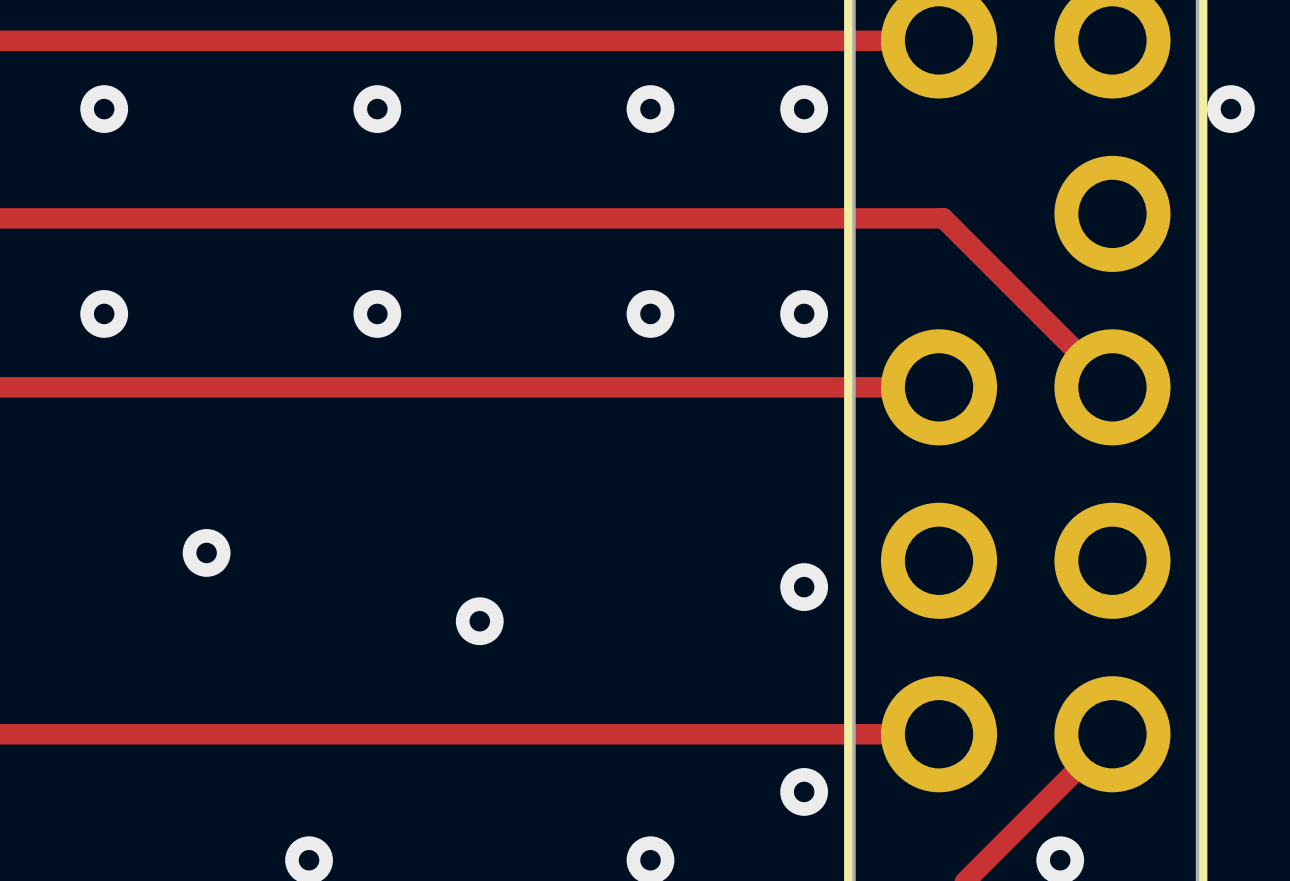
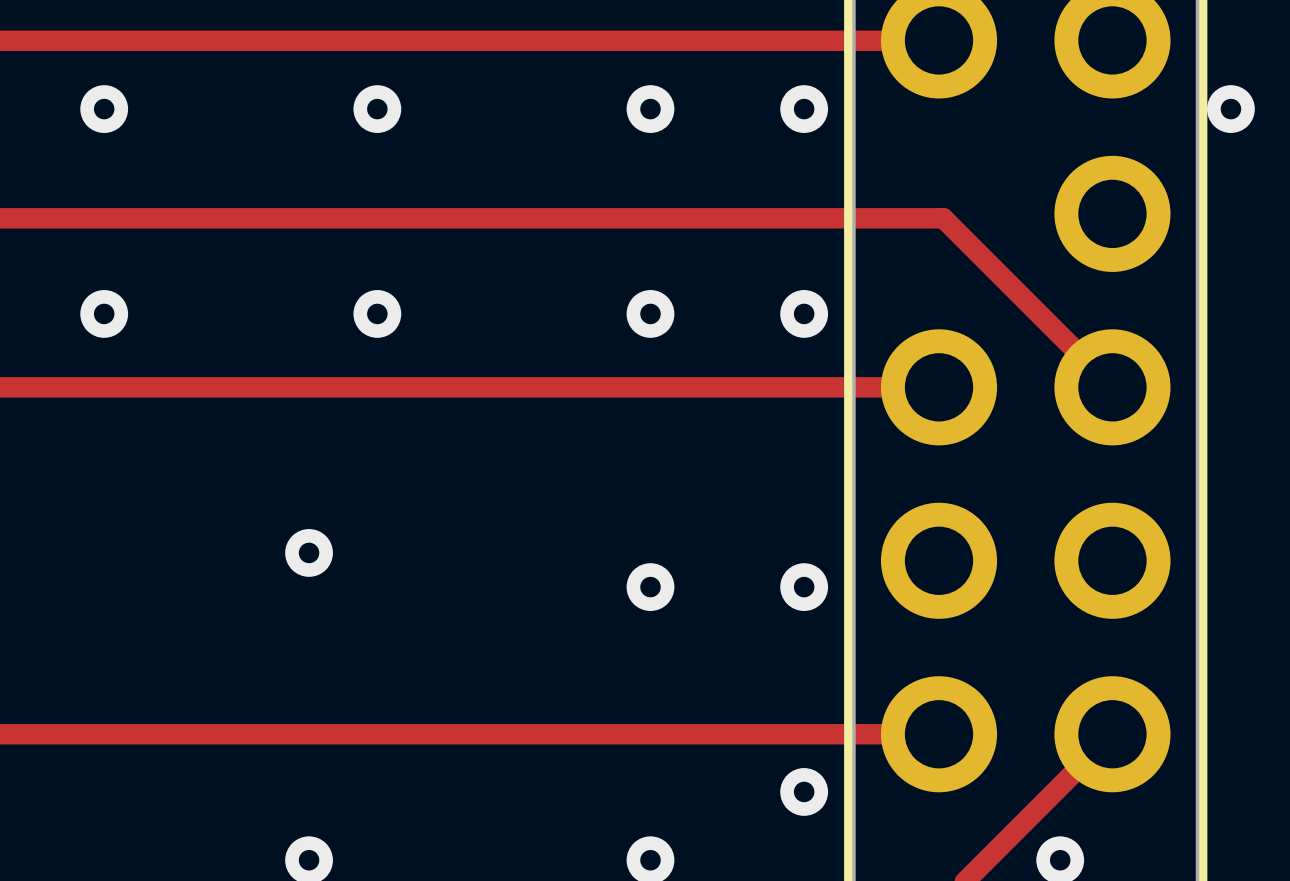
via: (206, 552) -> none
via: none -> (309, 552)
via: none -> (650, 587)
via: (479, 621) -> none

